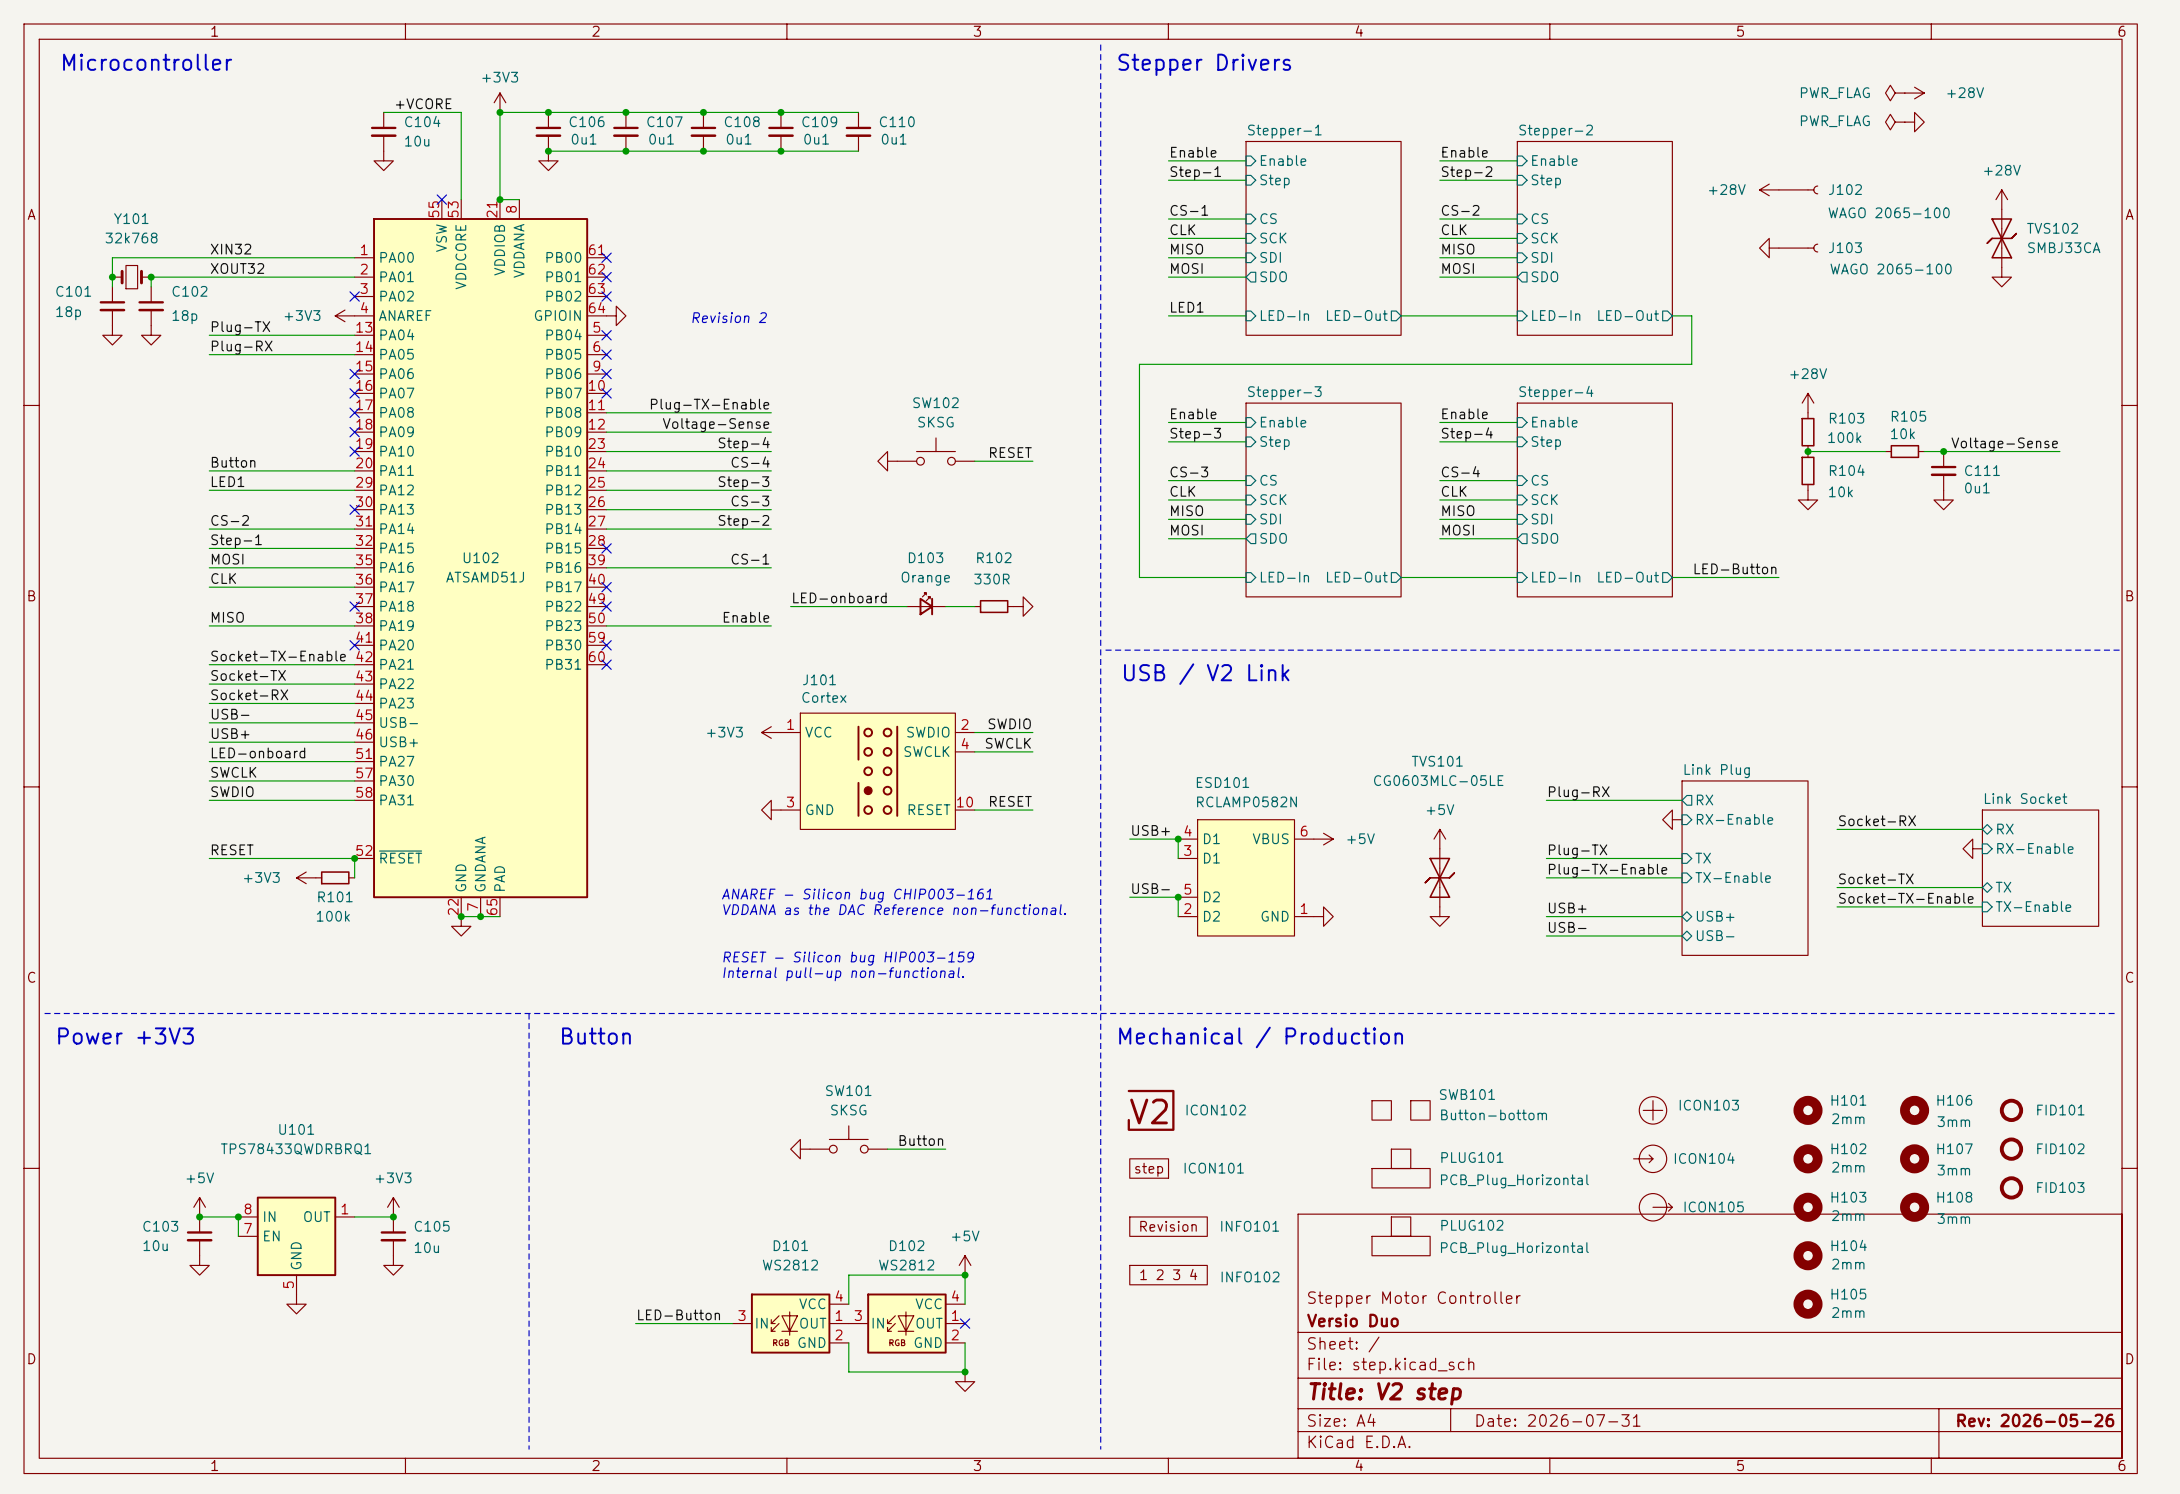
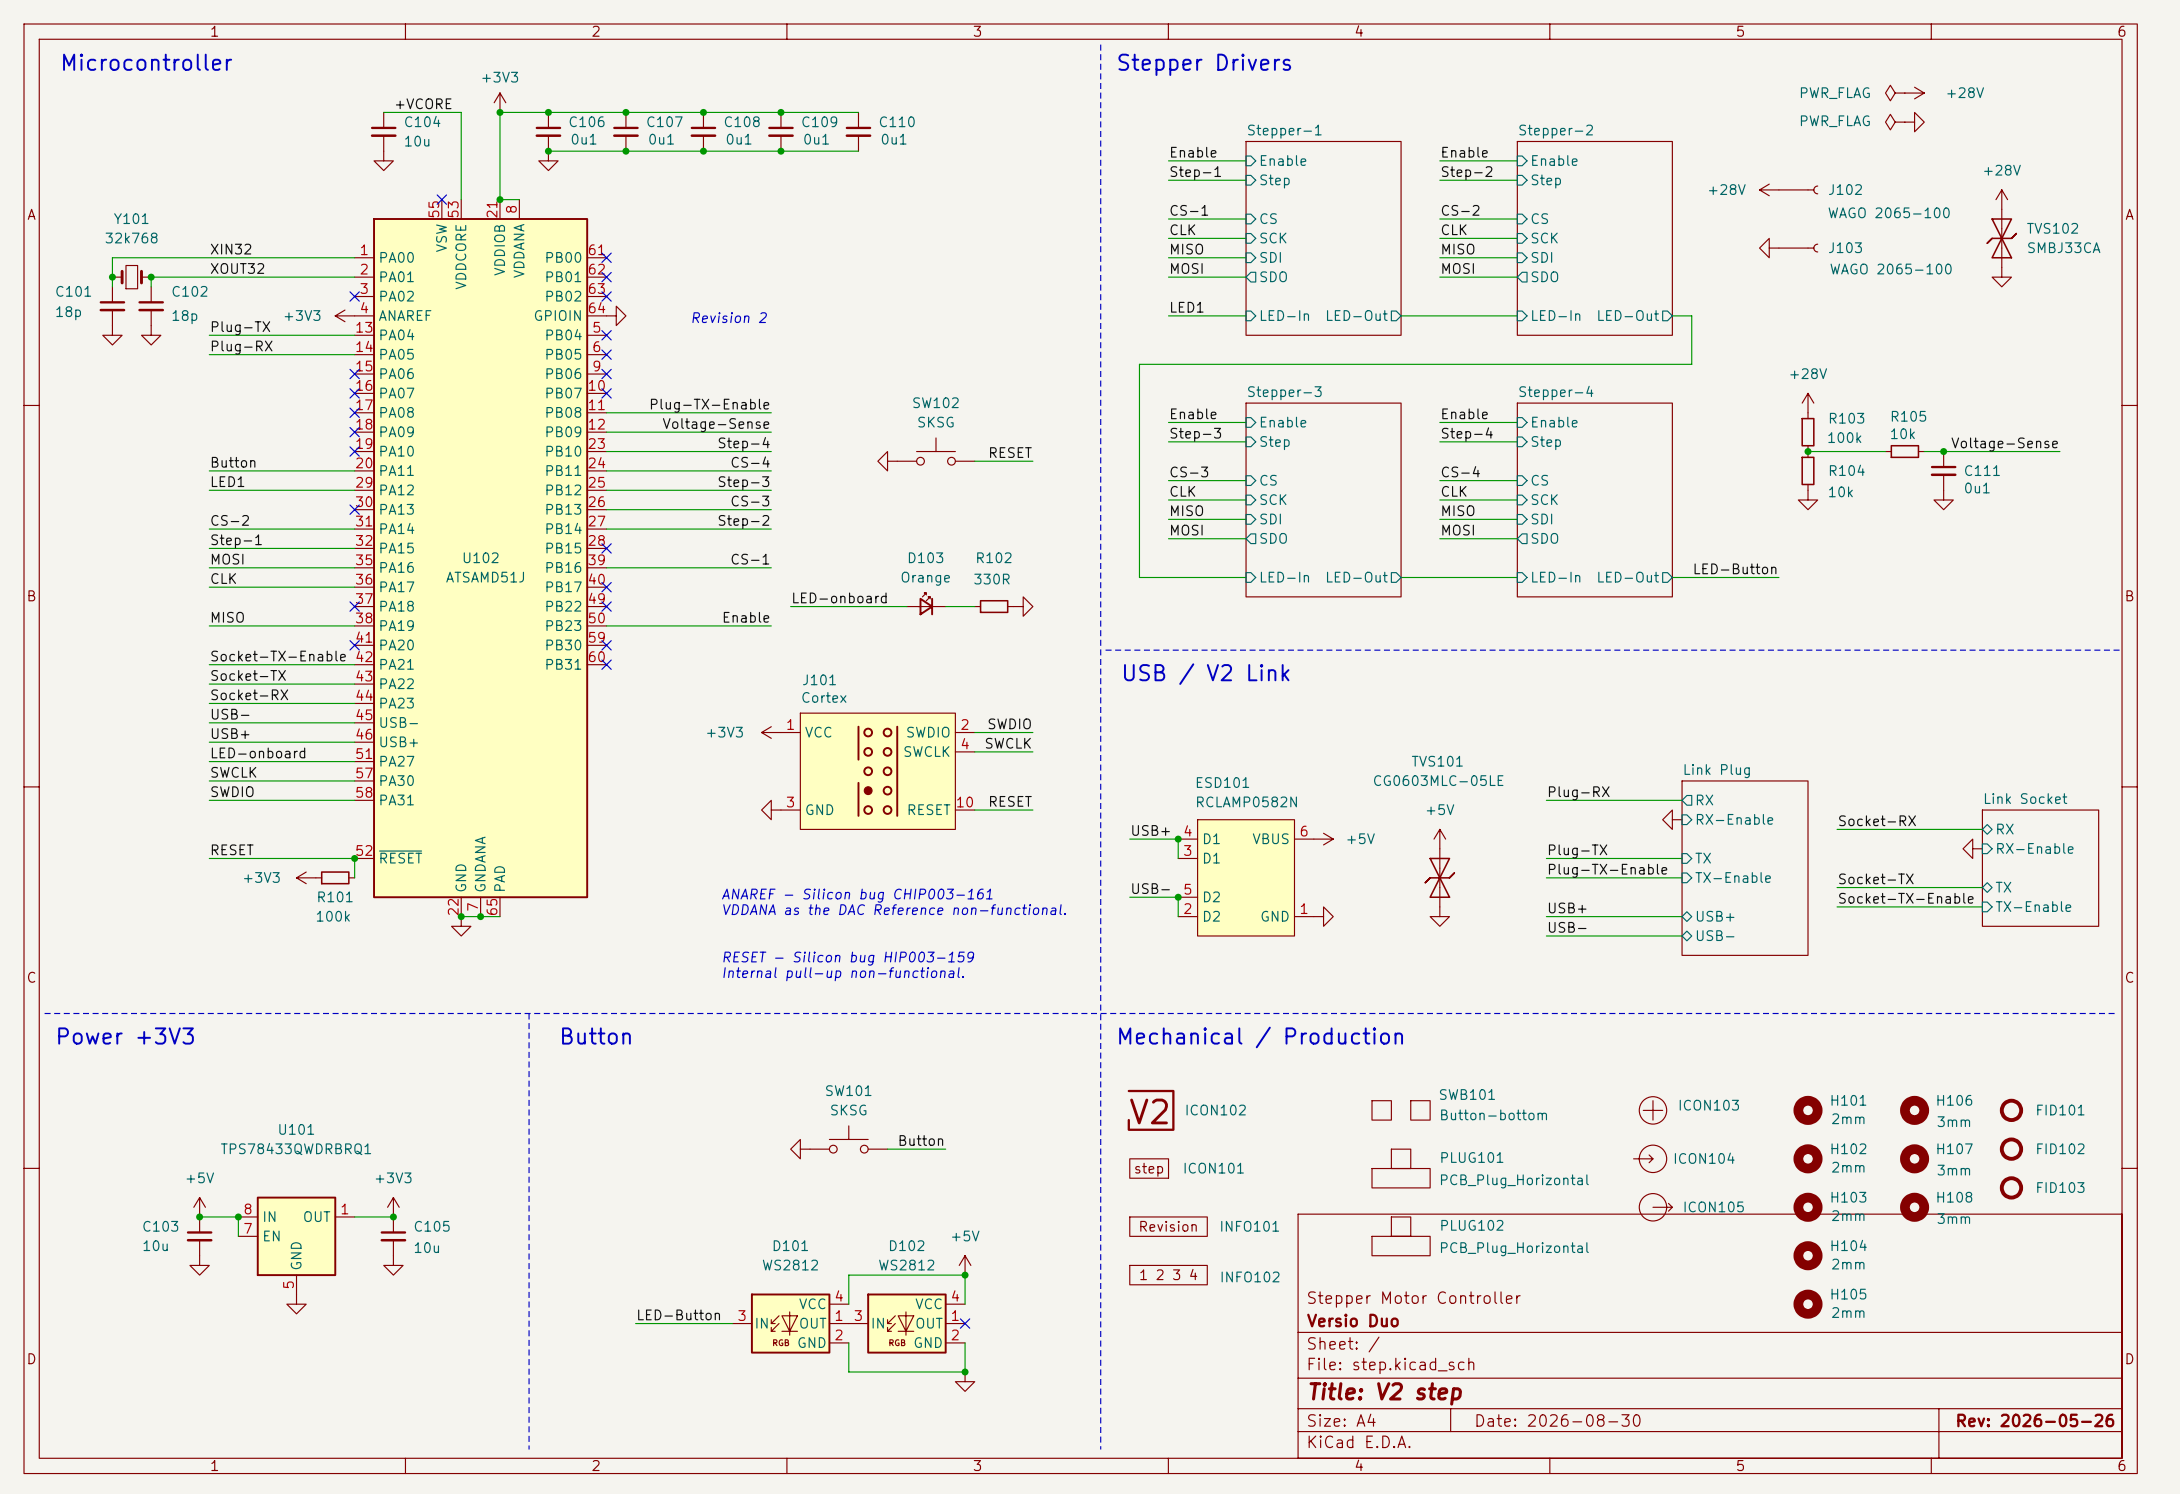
title block: Date: 2026-07-31 (1558, 1420) -> Date: 2026-08-30 (1558, 1420)

